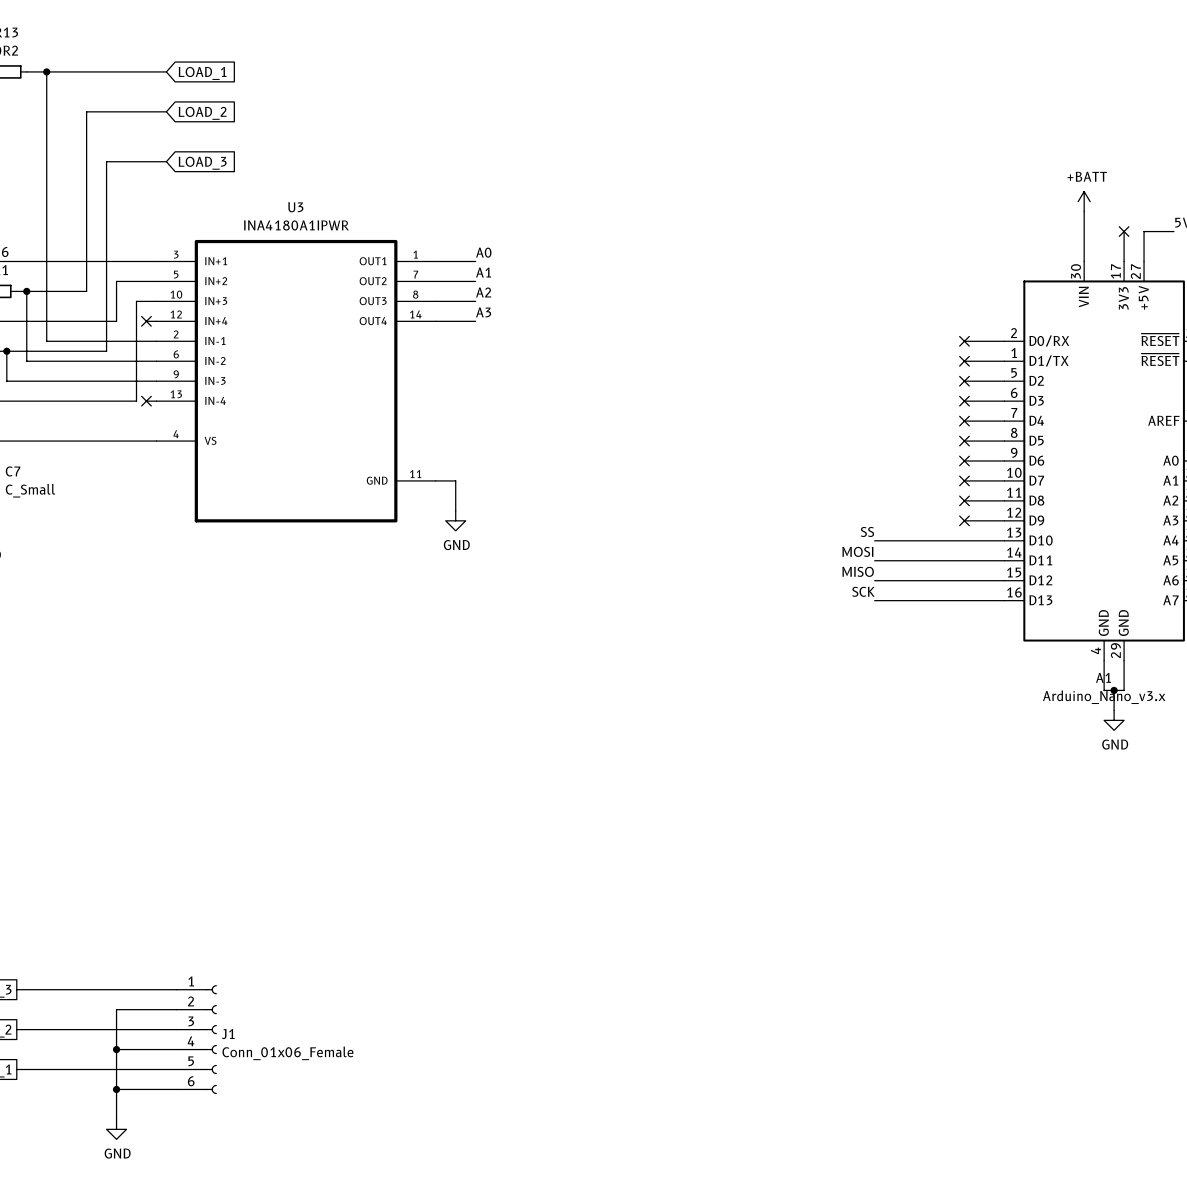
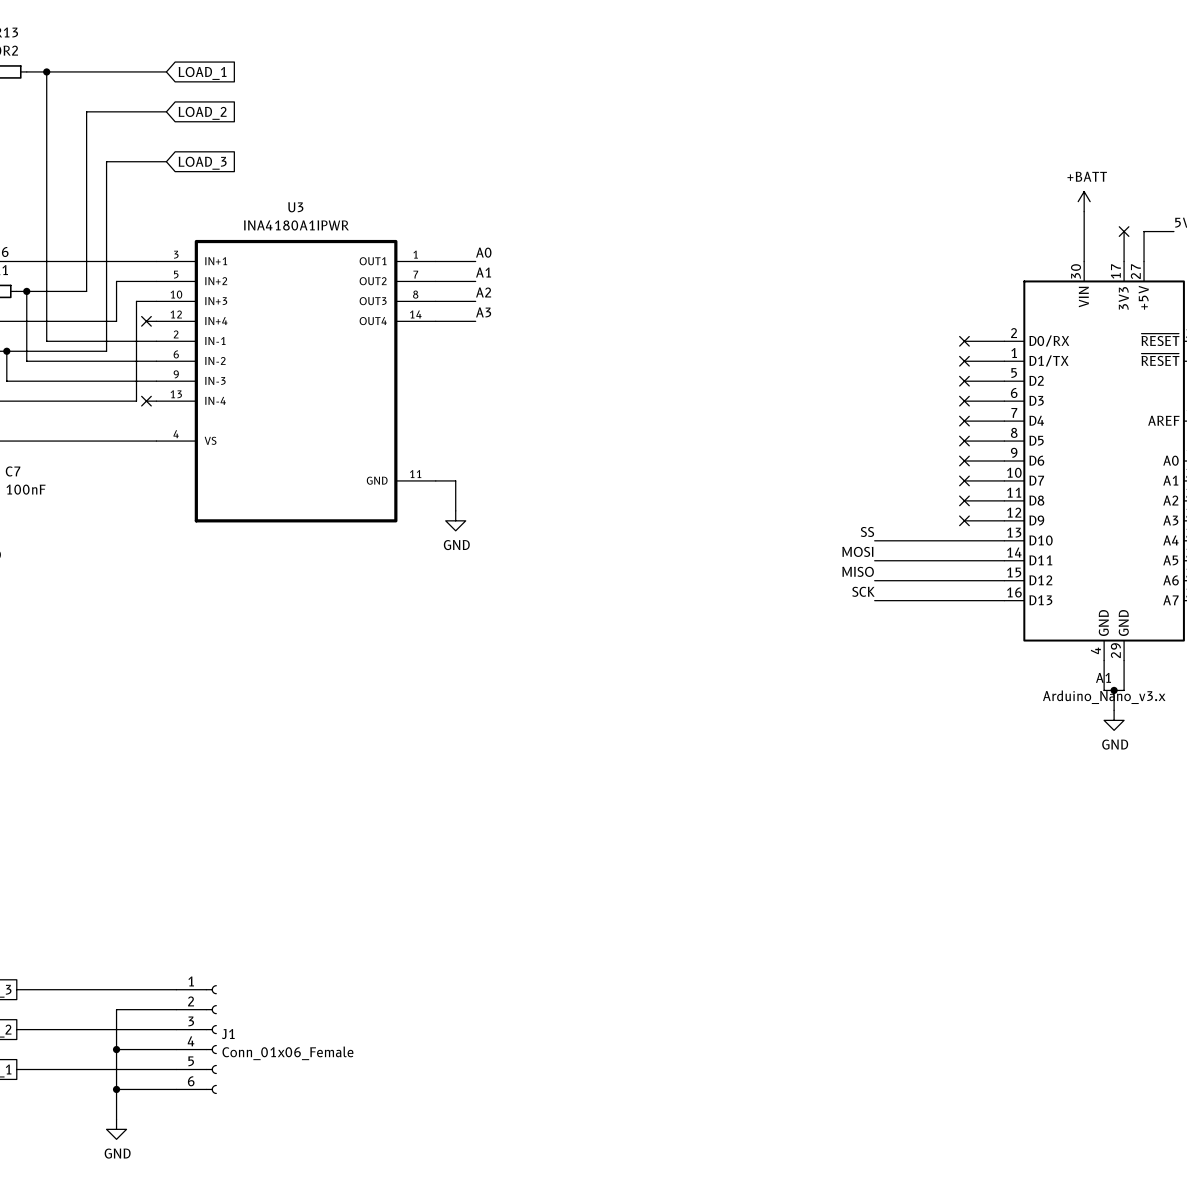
C7 value: C_Small (30, 490) -> 100nF (26, 489)

